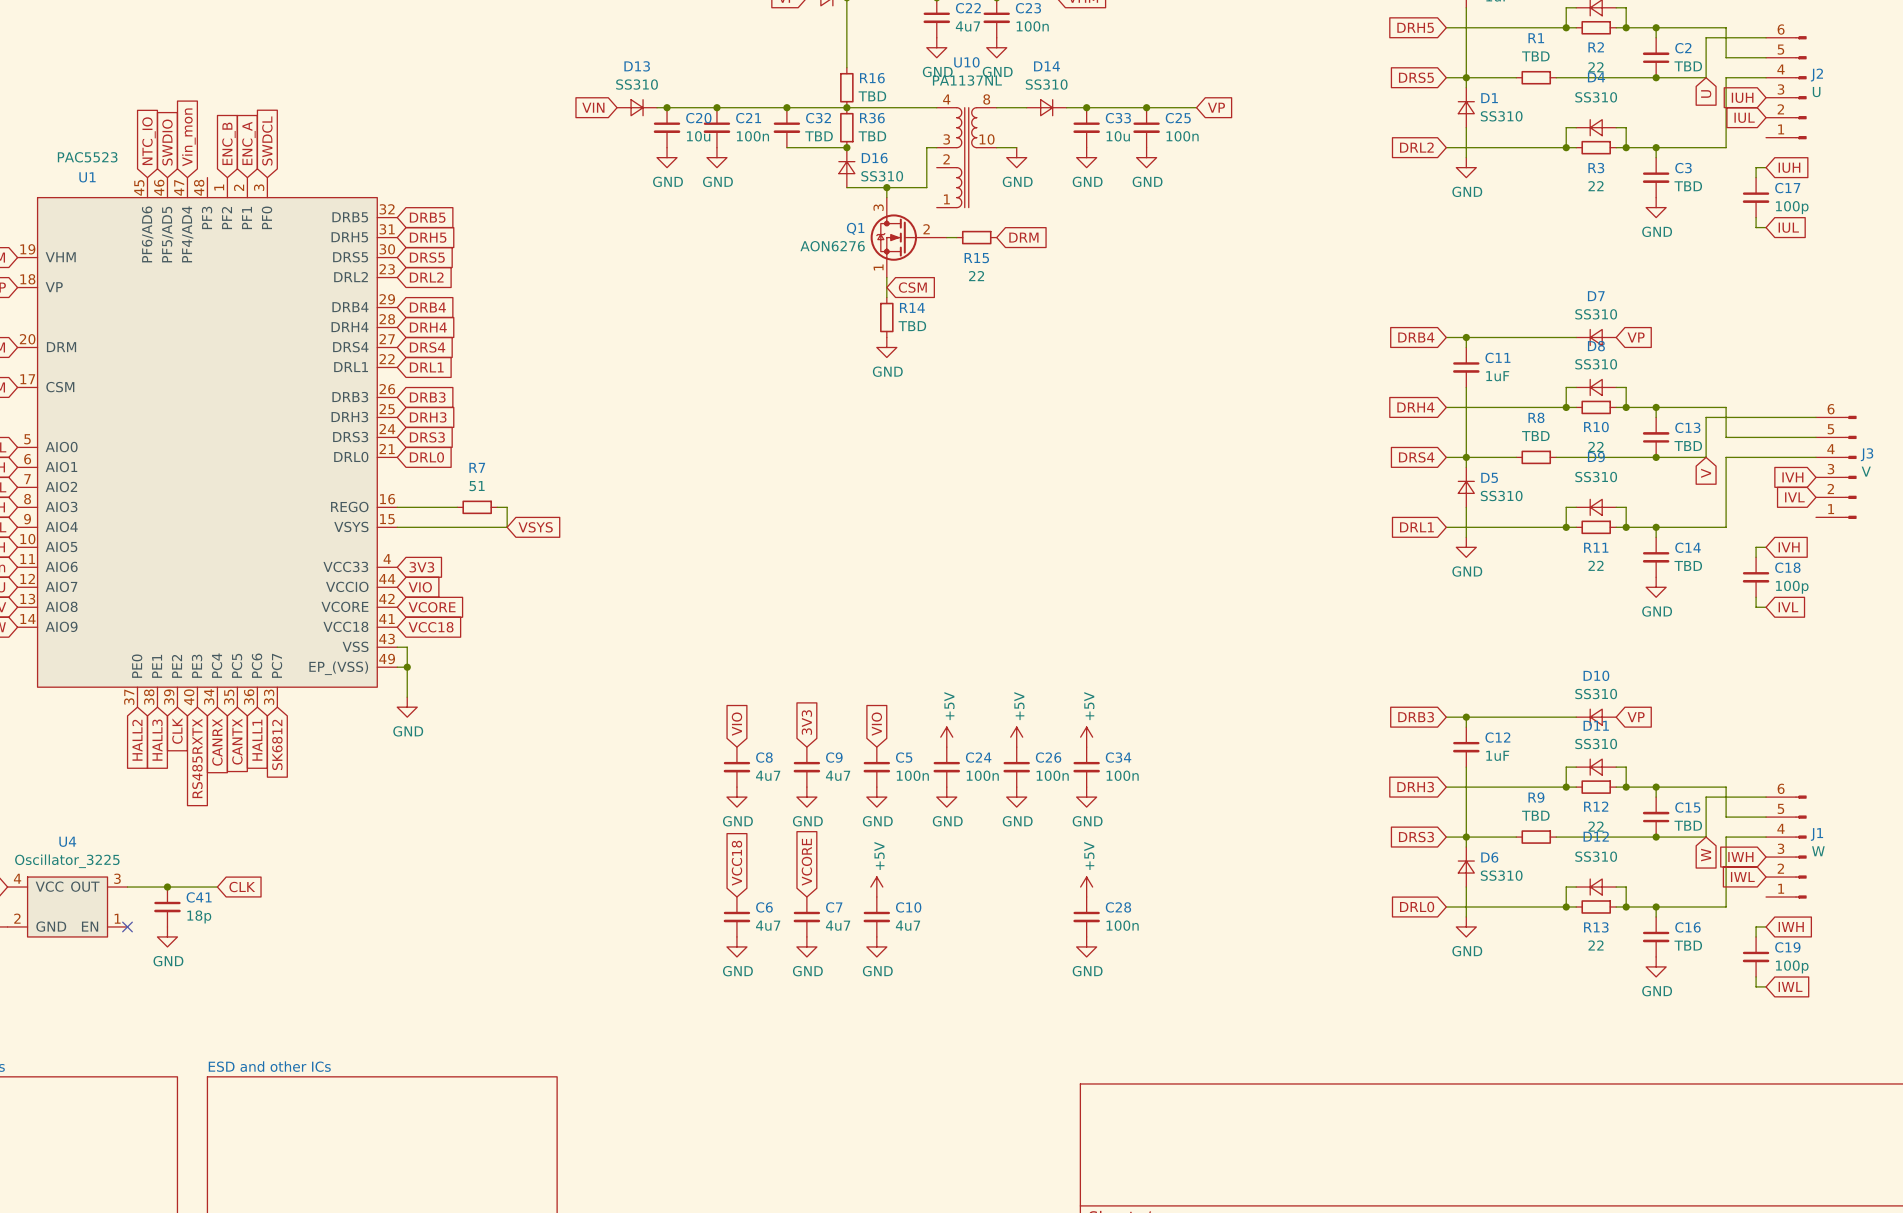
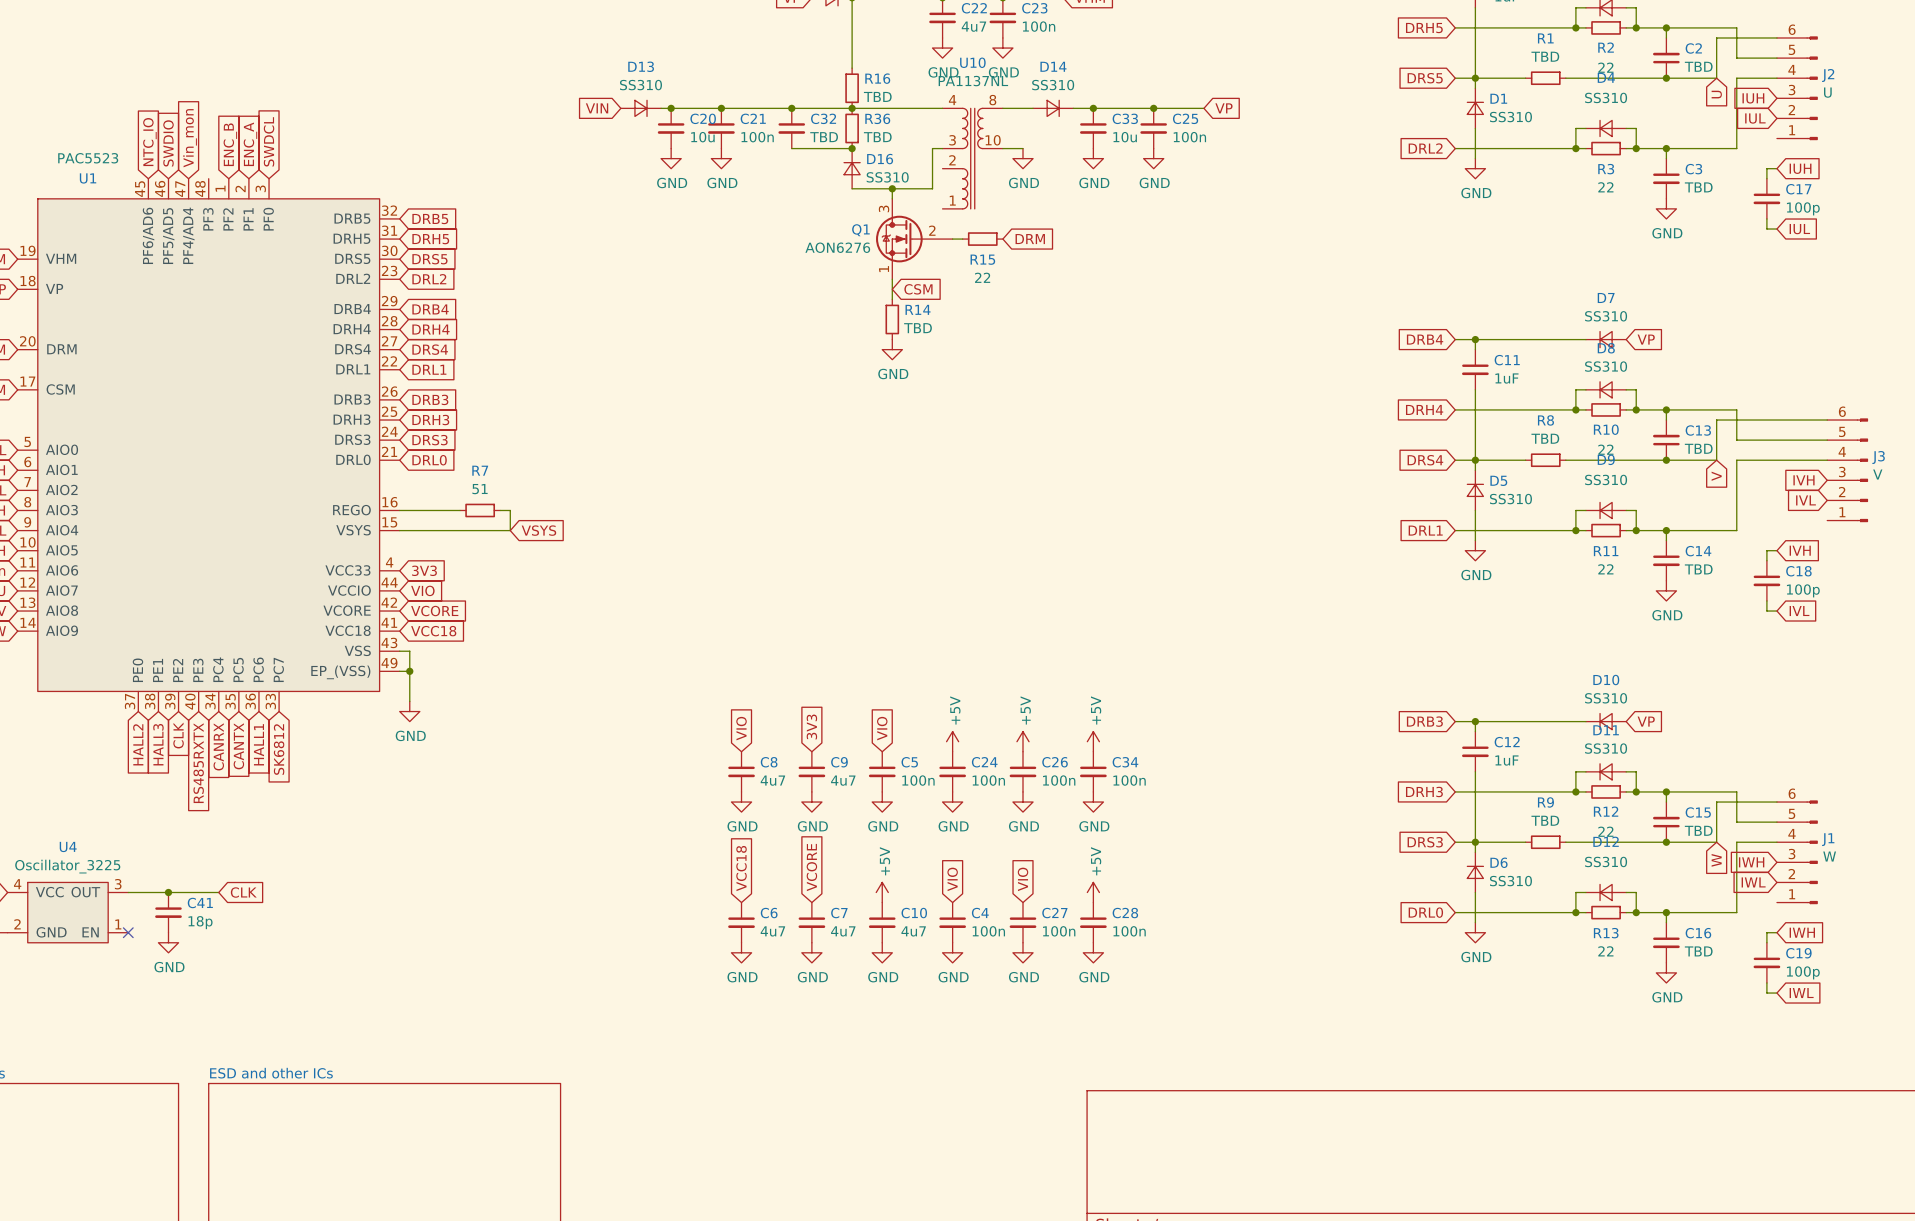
global label: none -> VIO (952, 879)
global label: none -> VIO (1023, 879)
C4: none -> 100n (952, 922)
C27: none -> 100n (1023, 922)
power symbol: none -> GND (952, 952)
power symbol: none -> GND (1023, 952)

